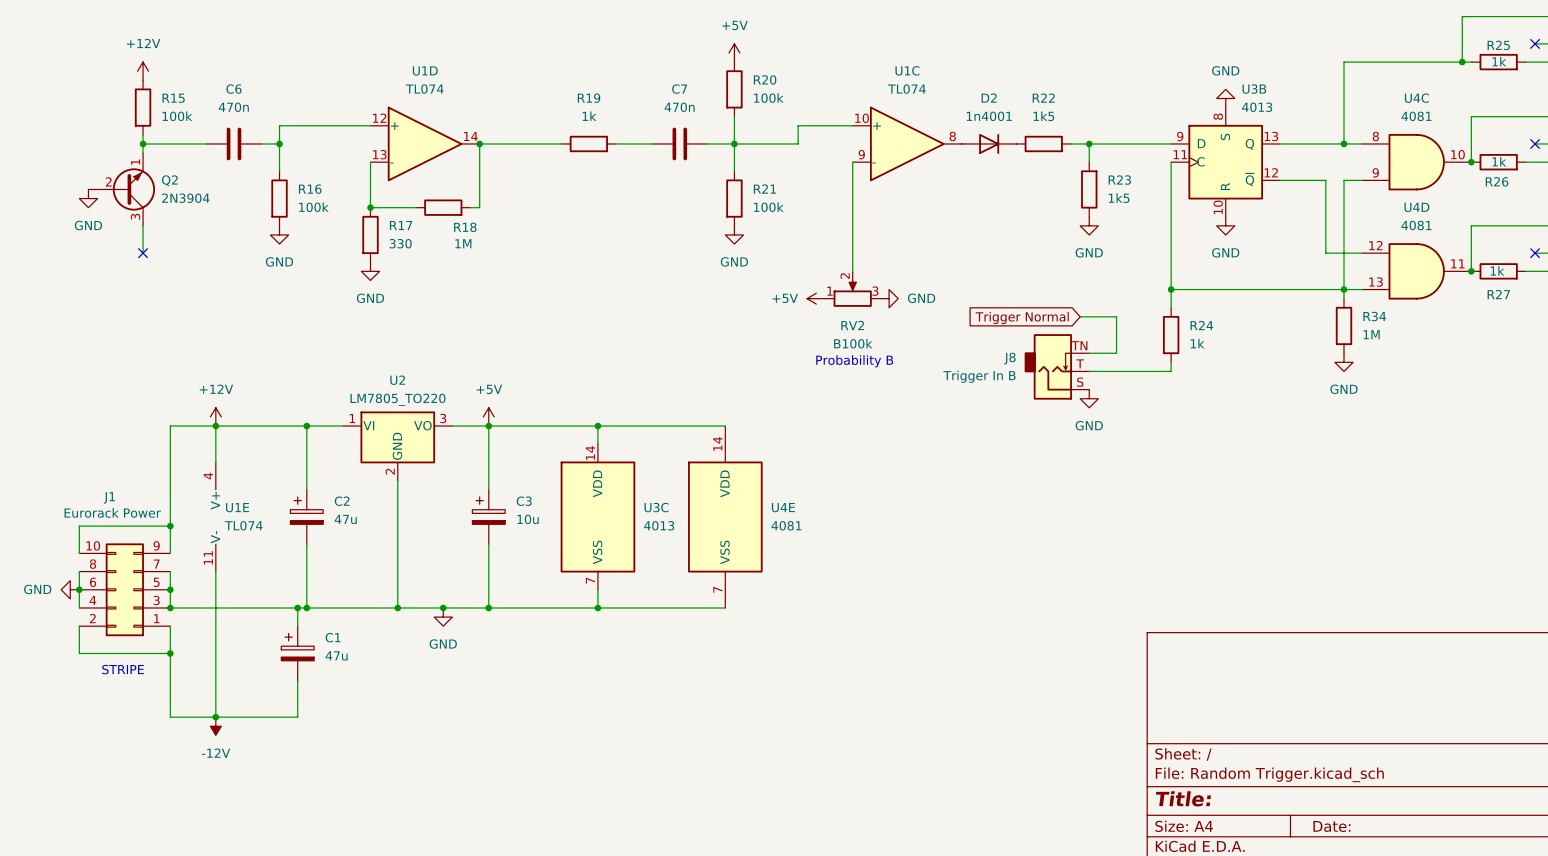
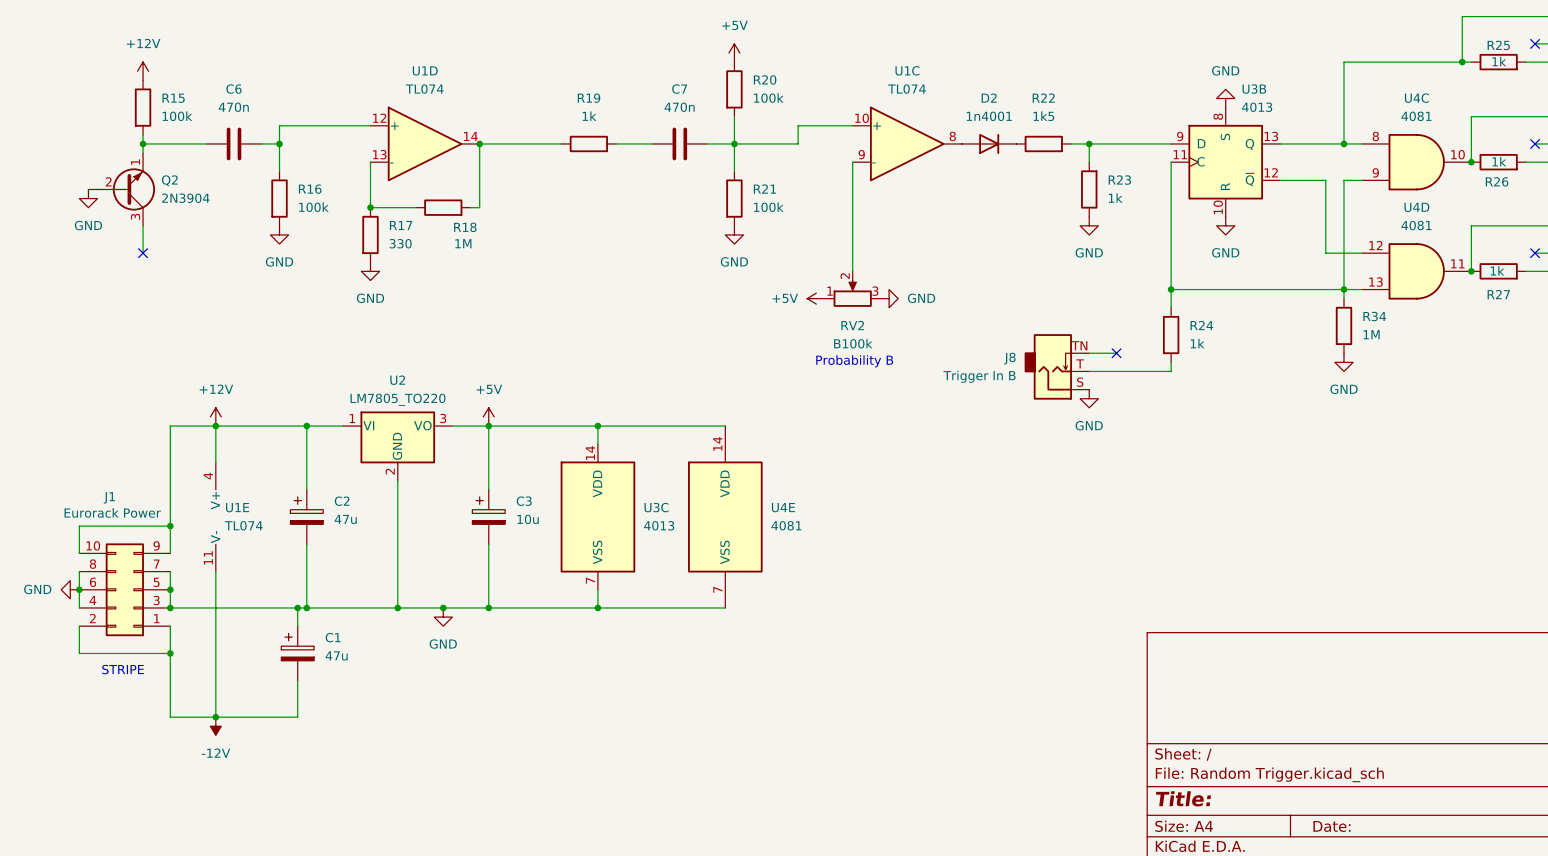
R23 value: 1k5 (1119, 198) -> 1k (1115, 198)
wire: (1080, 316) (1116, 316) (1116, 353) -> none
global label: Trigger Normal (1022, 317) -> none
no-connect mark: none -> (1116, 353)

